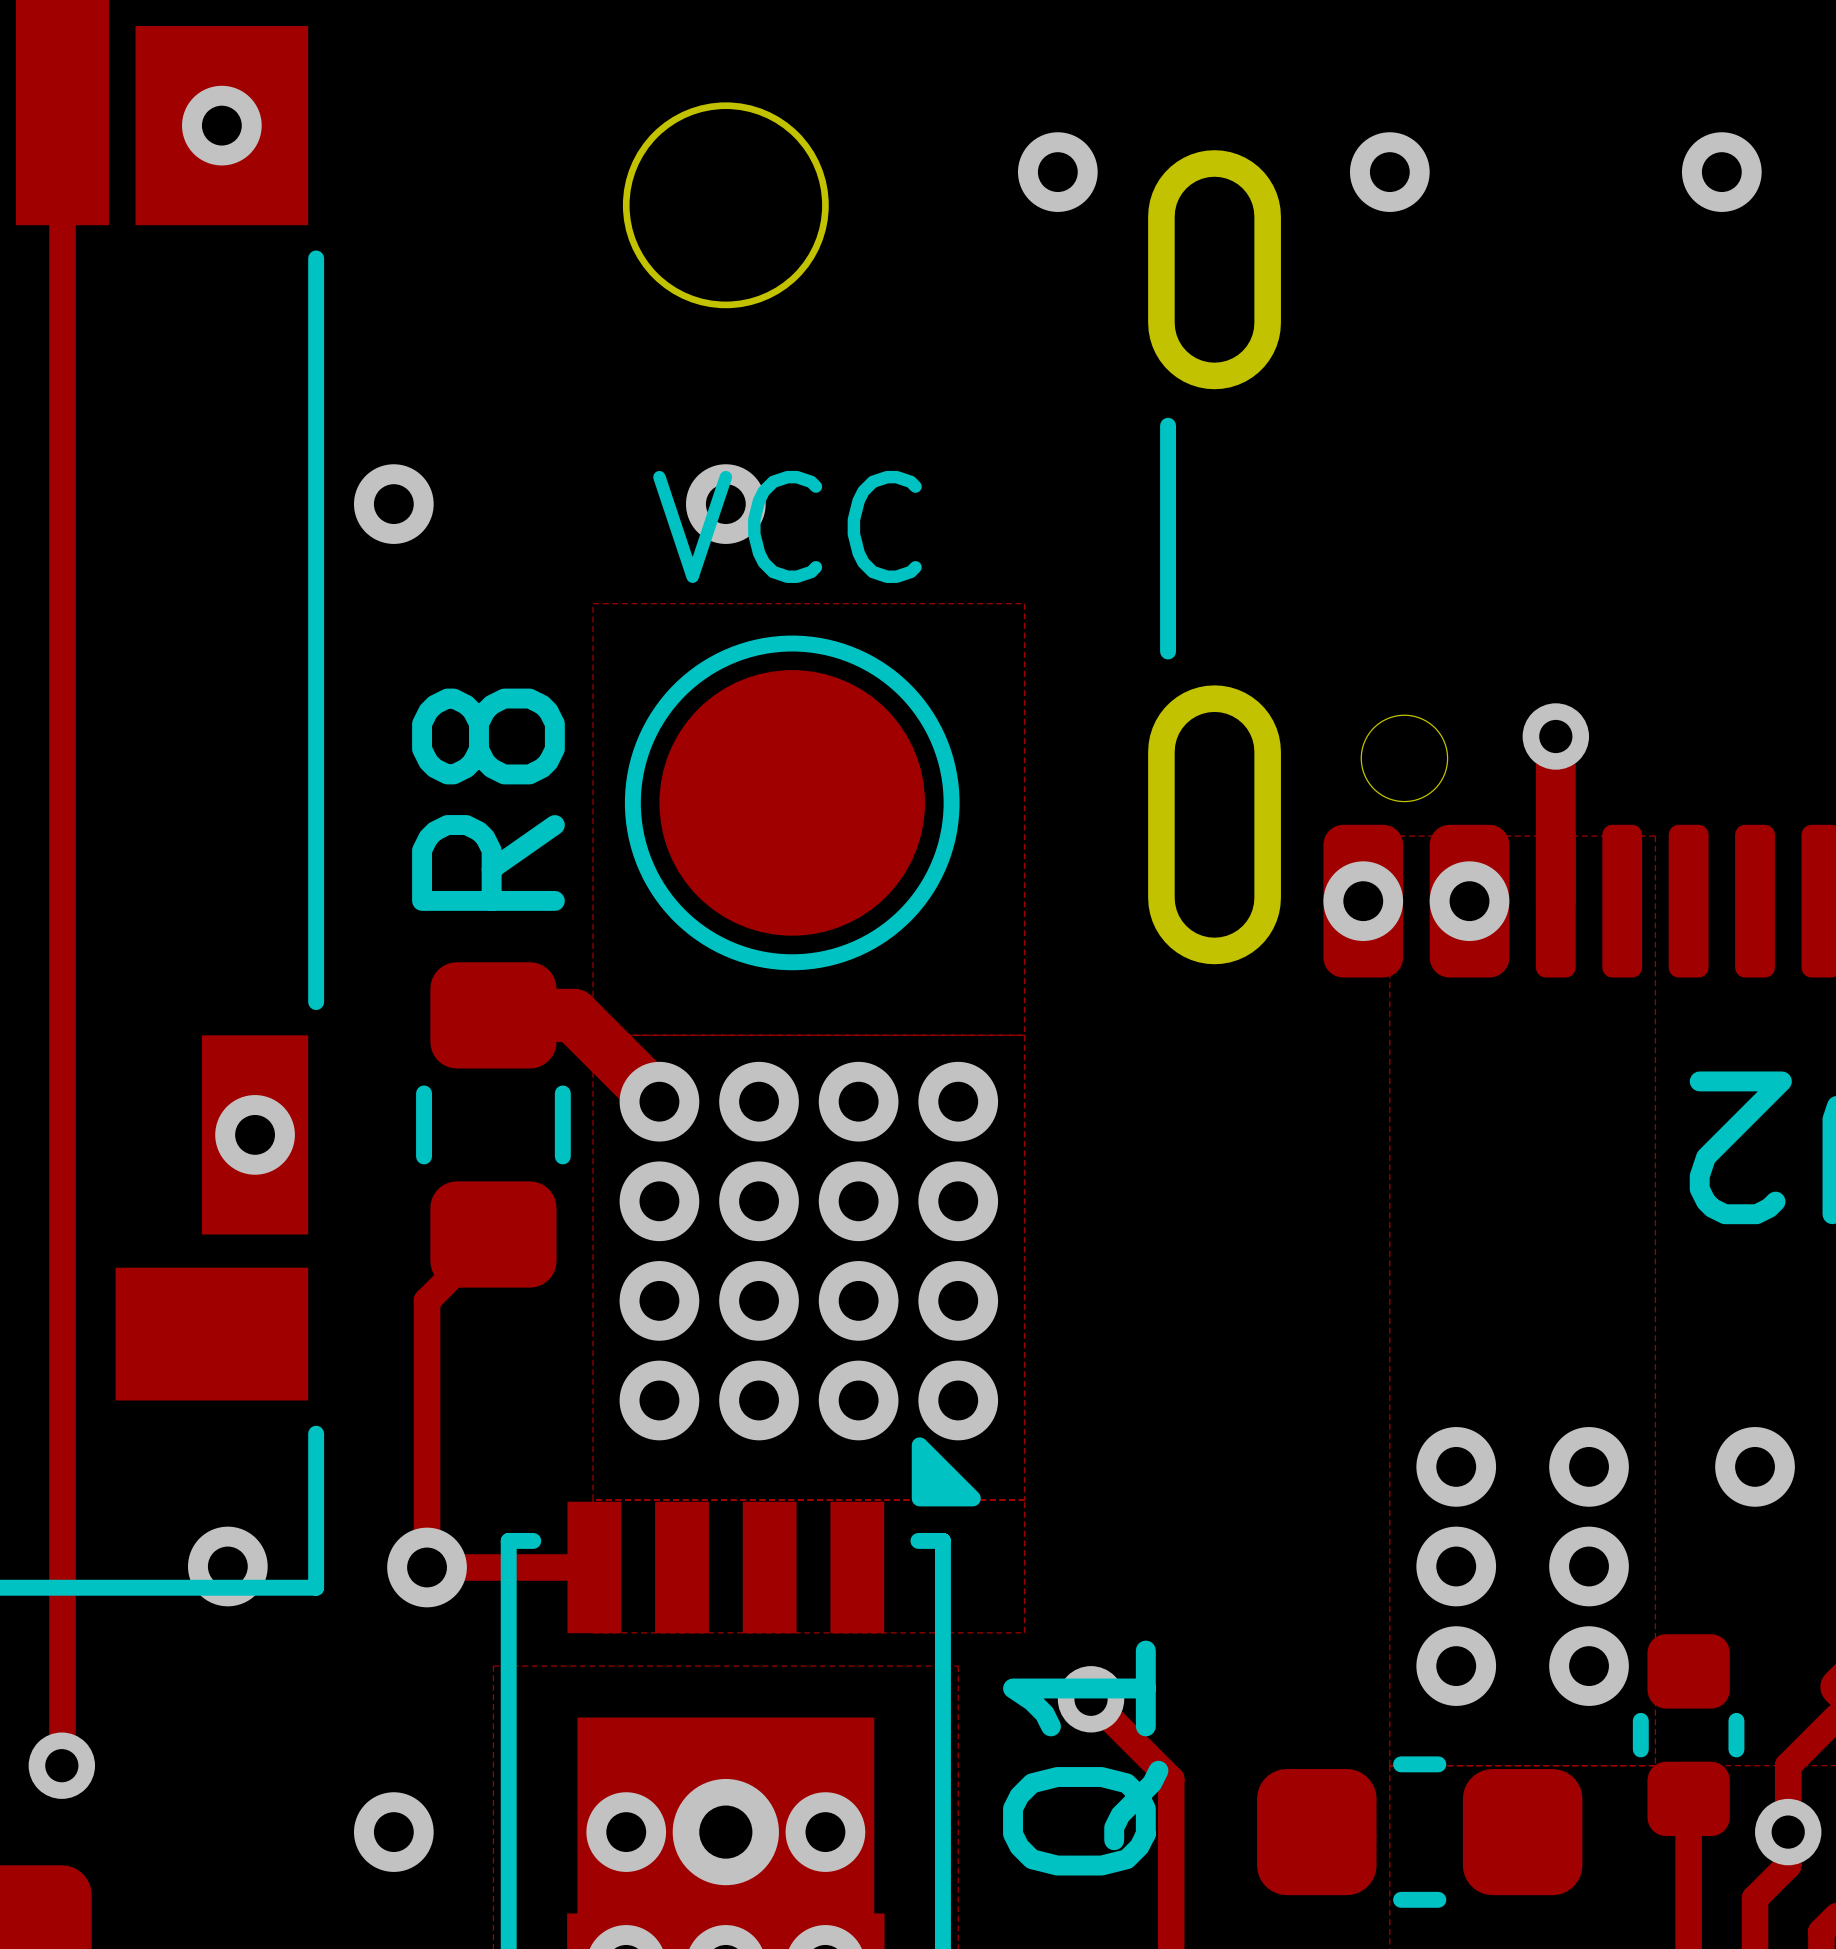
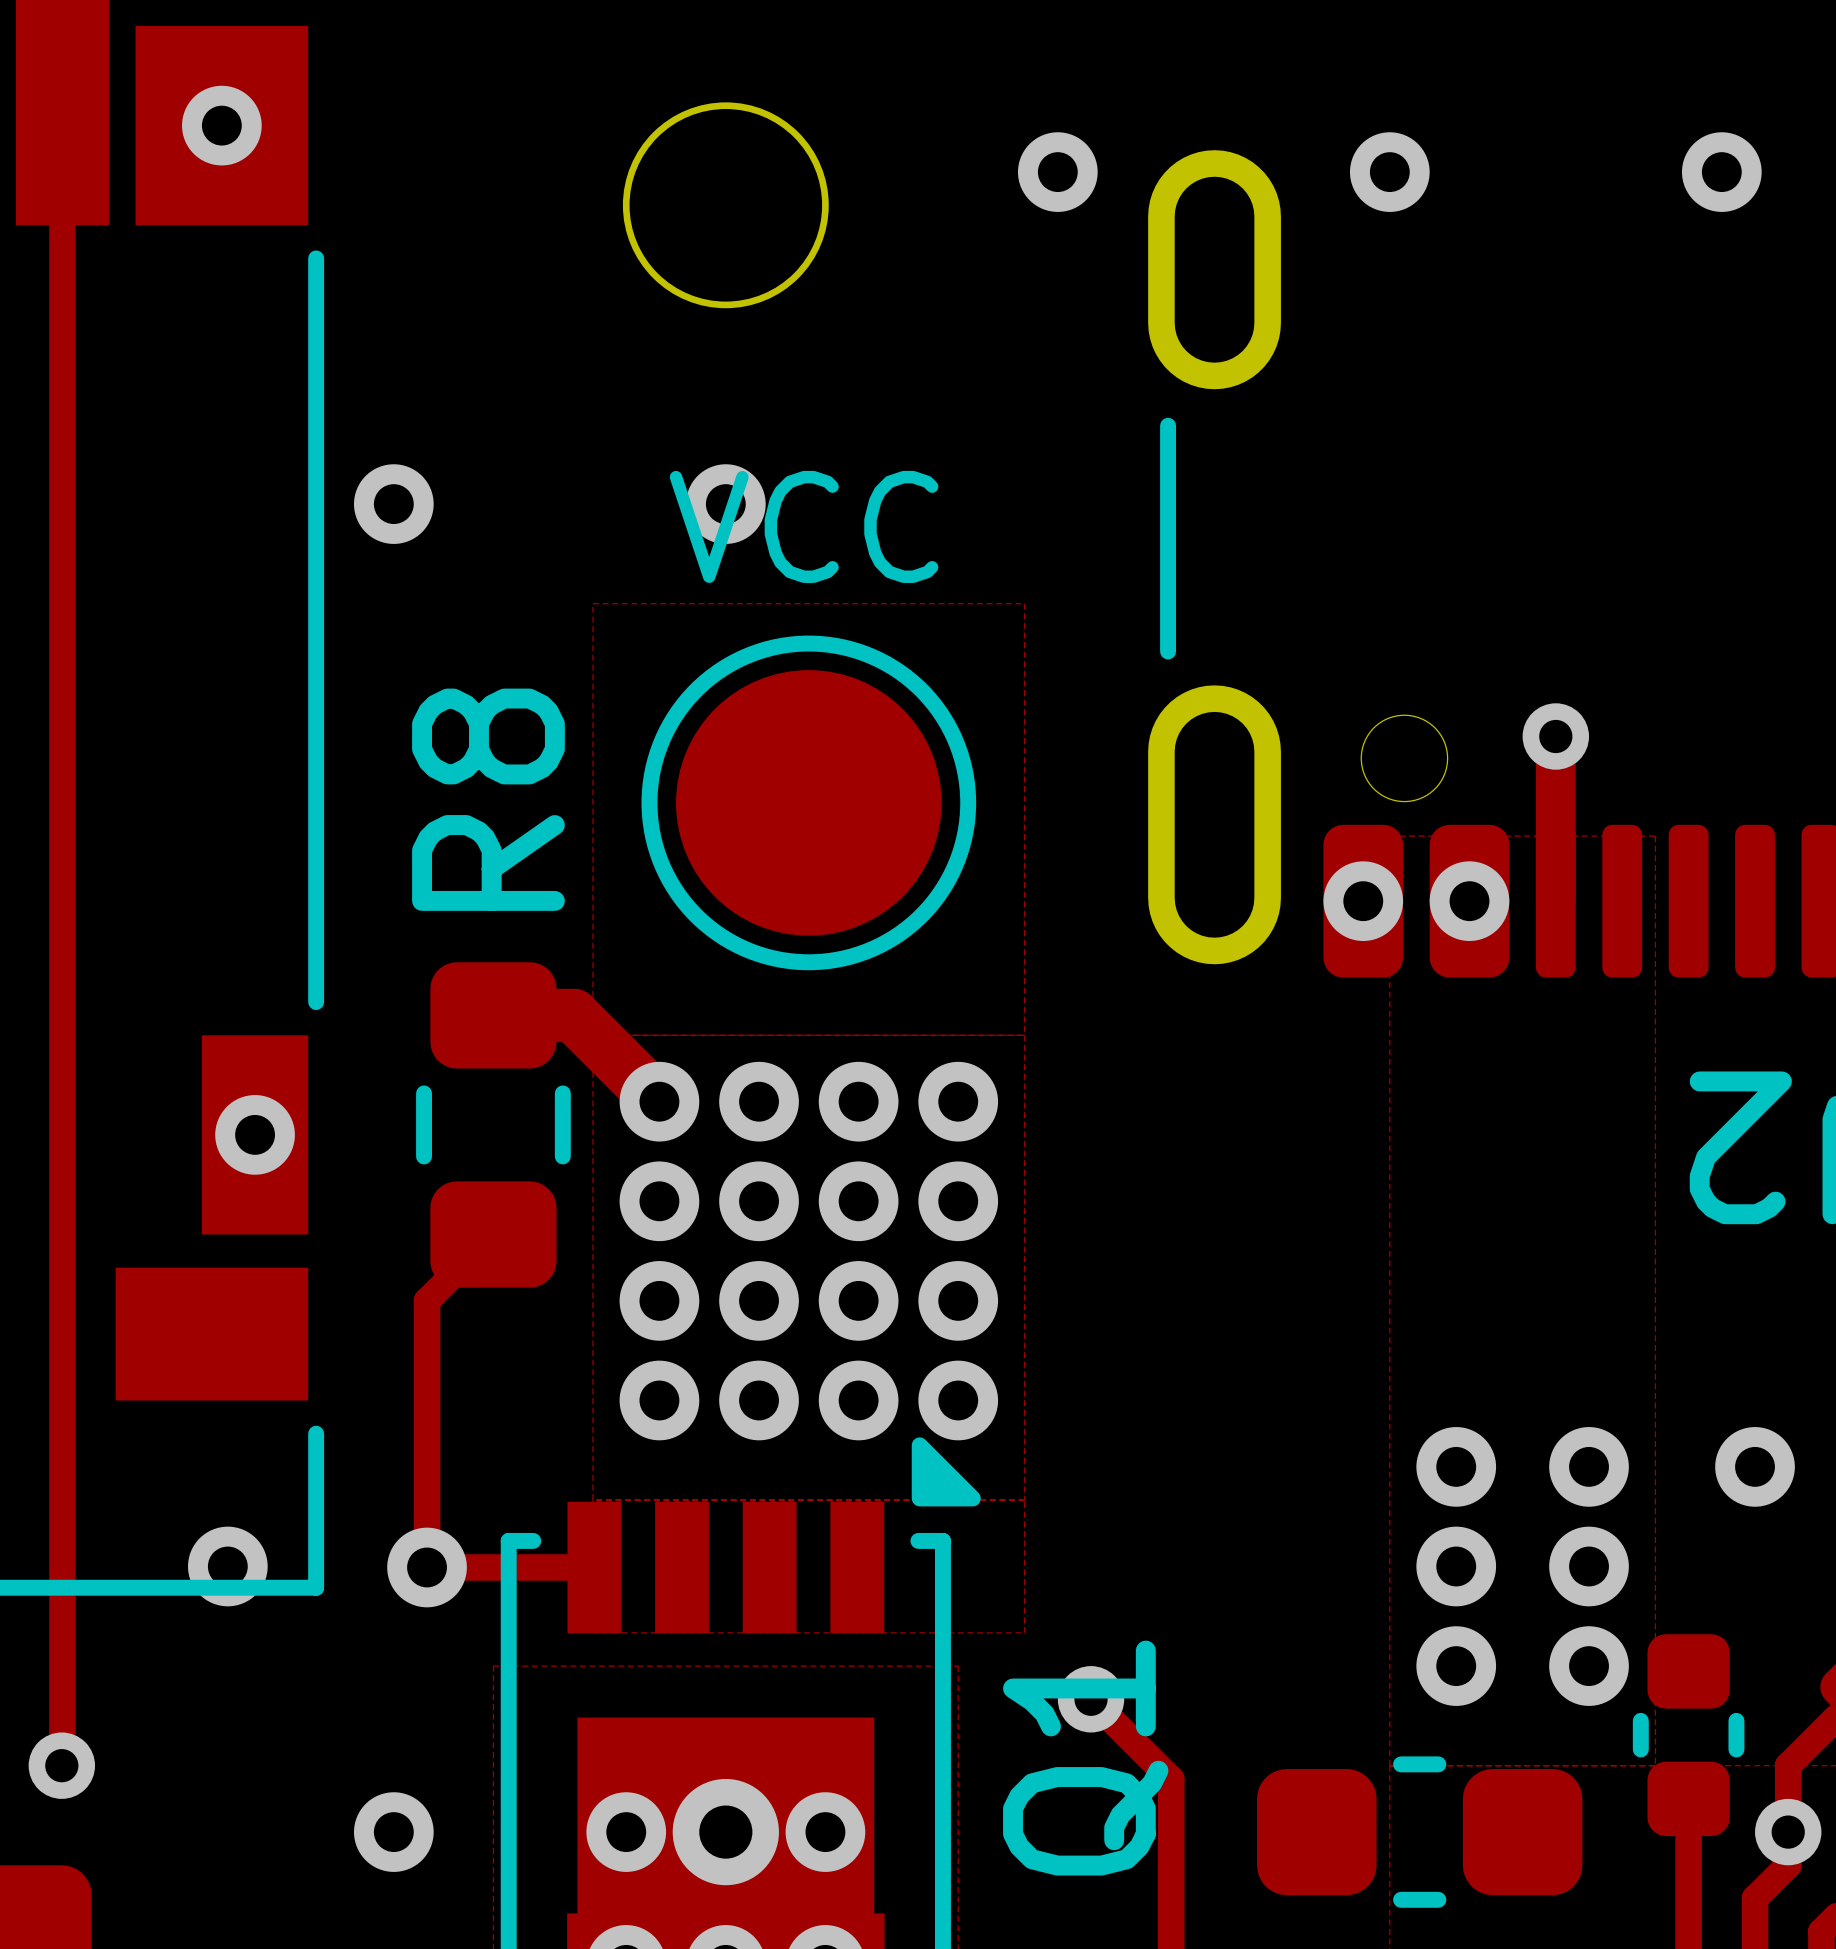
part position: (792, 802) -> (808, 802)

